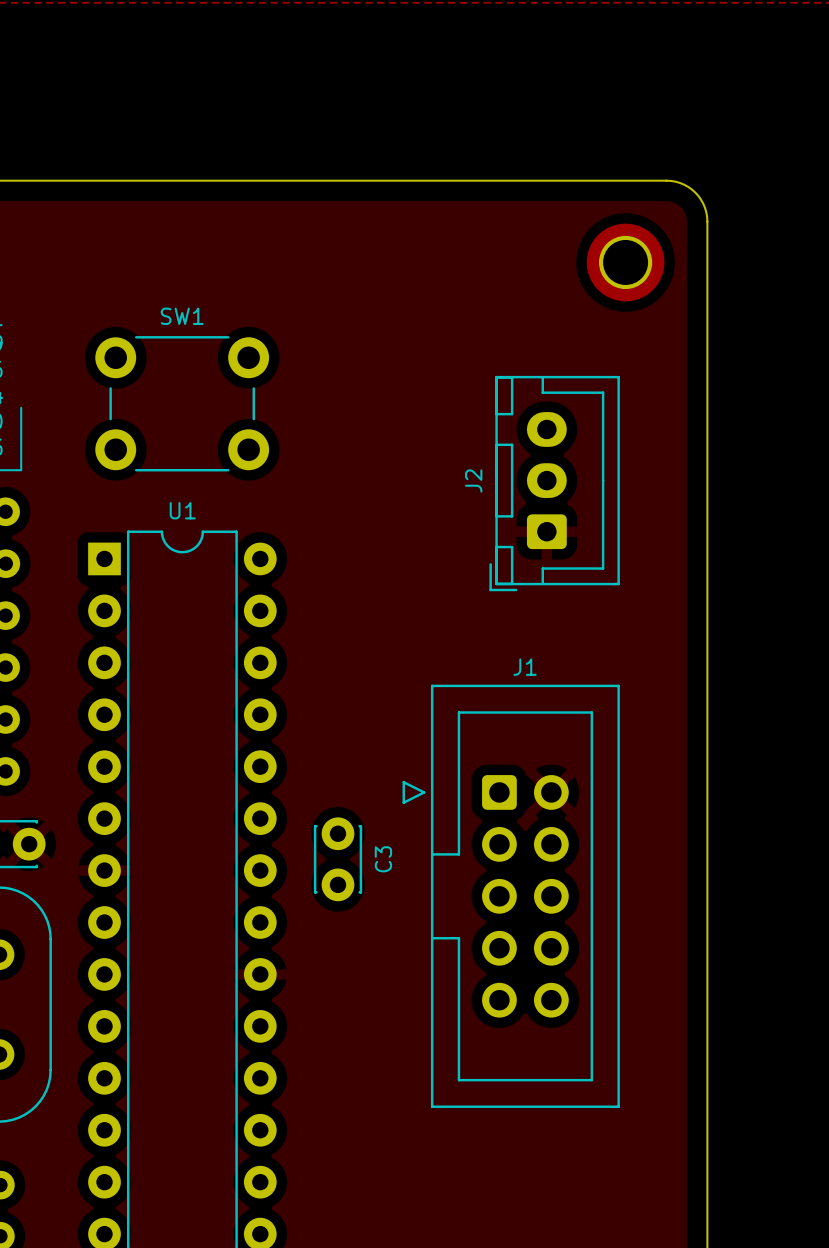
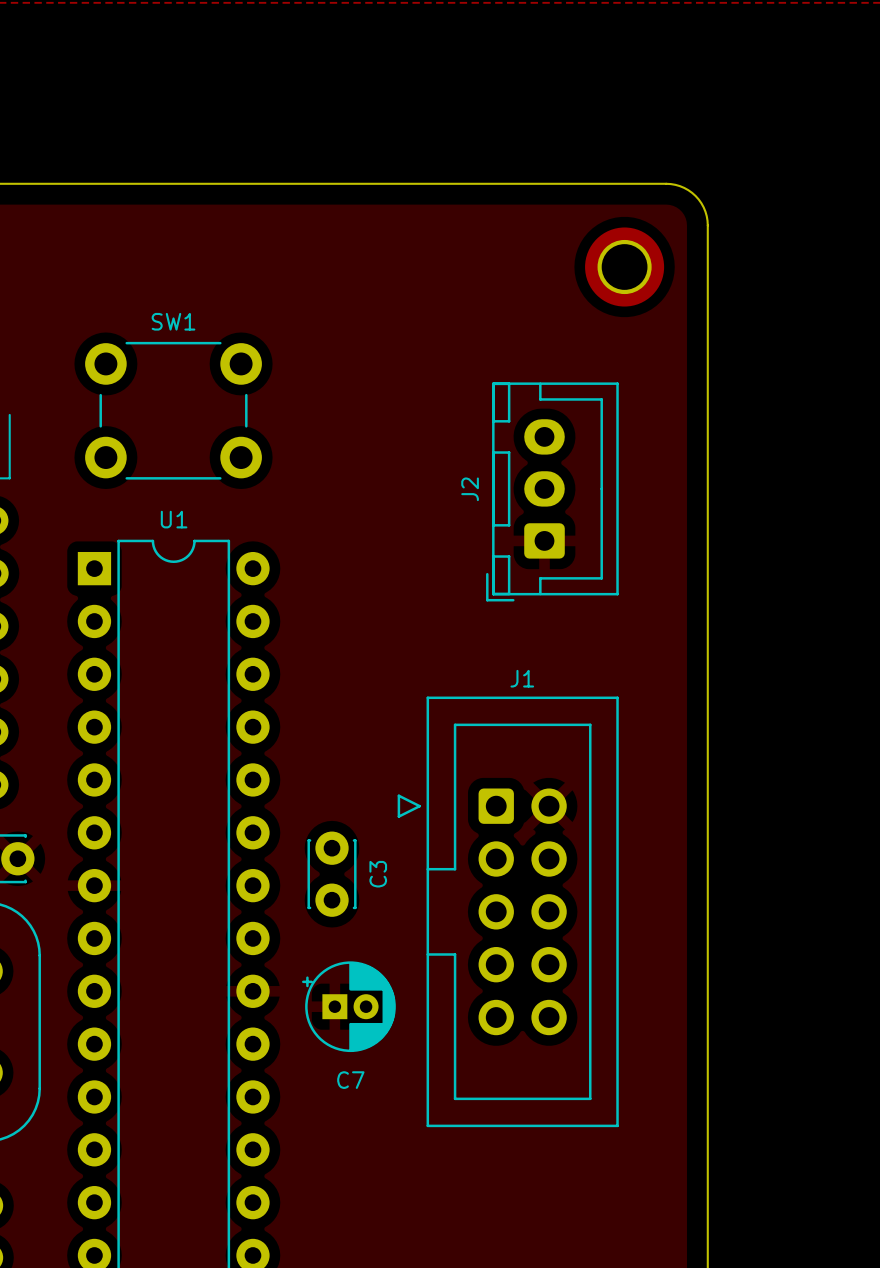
C7: none -> (348, 1006)

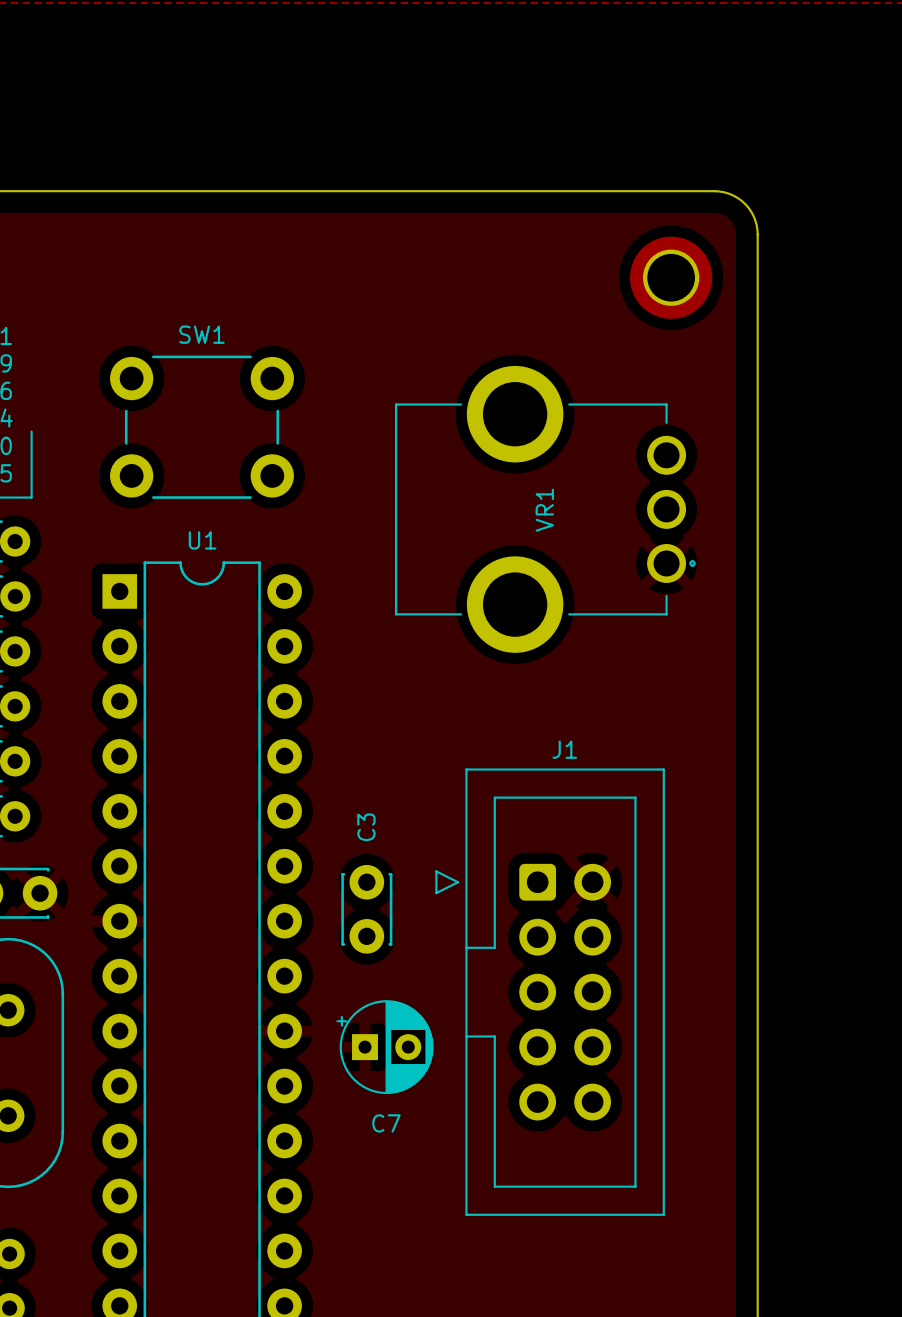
VR1: none -> (545, 509)
J2: (552, 491) -> none
J1 footprint: [397, 696, 619, 1128] -> [435, 768, 665, 1216]
C3 name position: C3 (378, 874) -> C3 (366, 827)
C7 footprint: [302, 961, 396, 1053] -> [336, 1000, 434, 1095]

